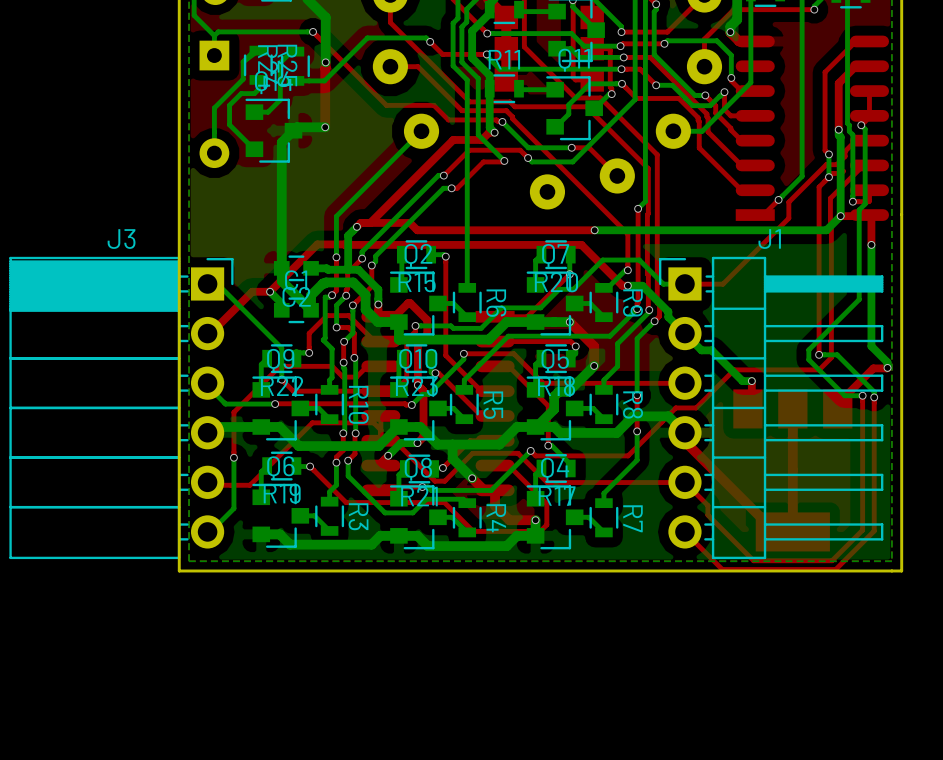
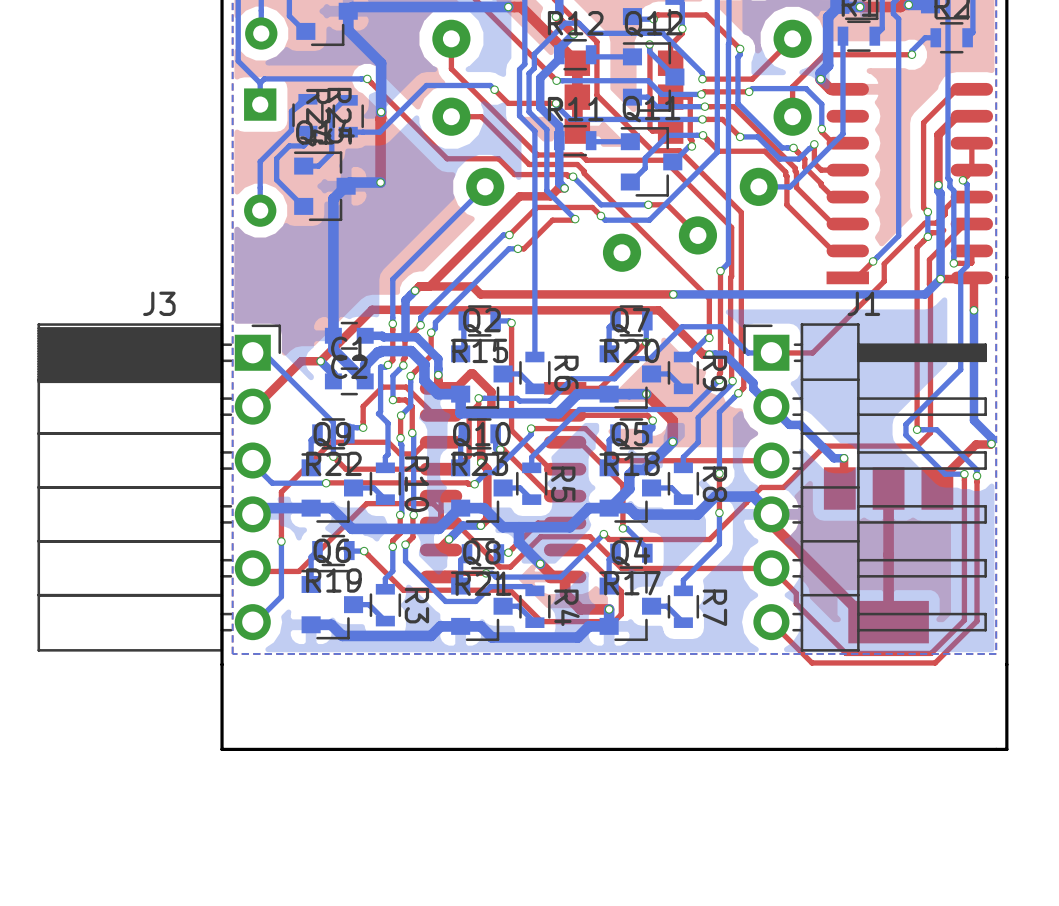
board edge: (901, 570) (179, 570) -> (1006, 664) (1006, 749) (222, 749) (222, 664)

